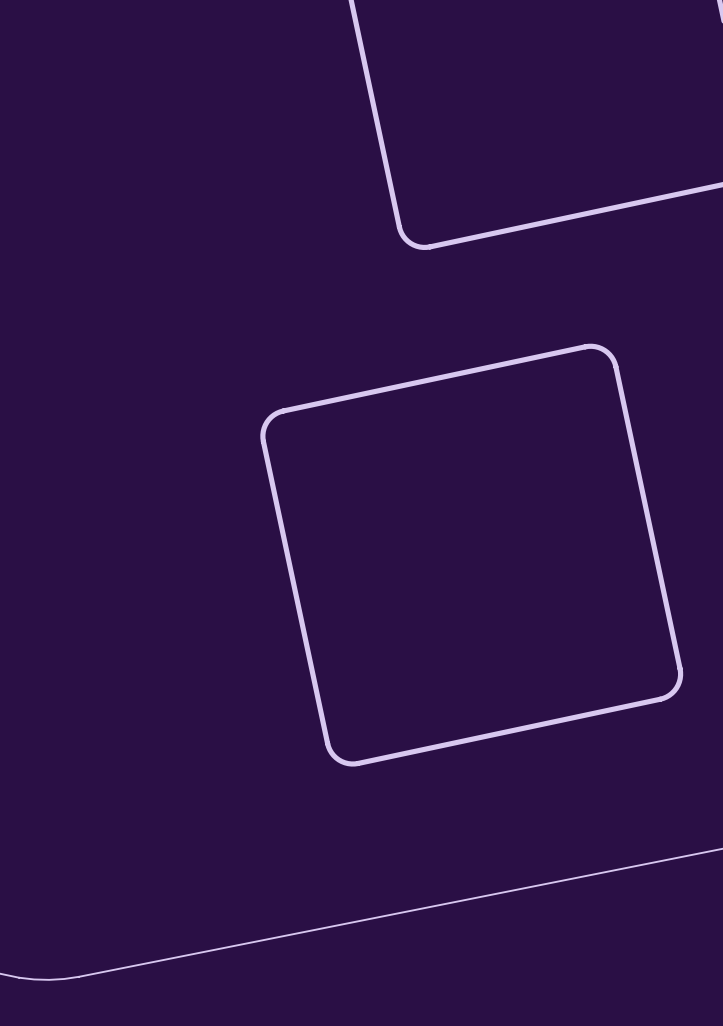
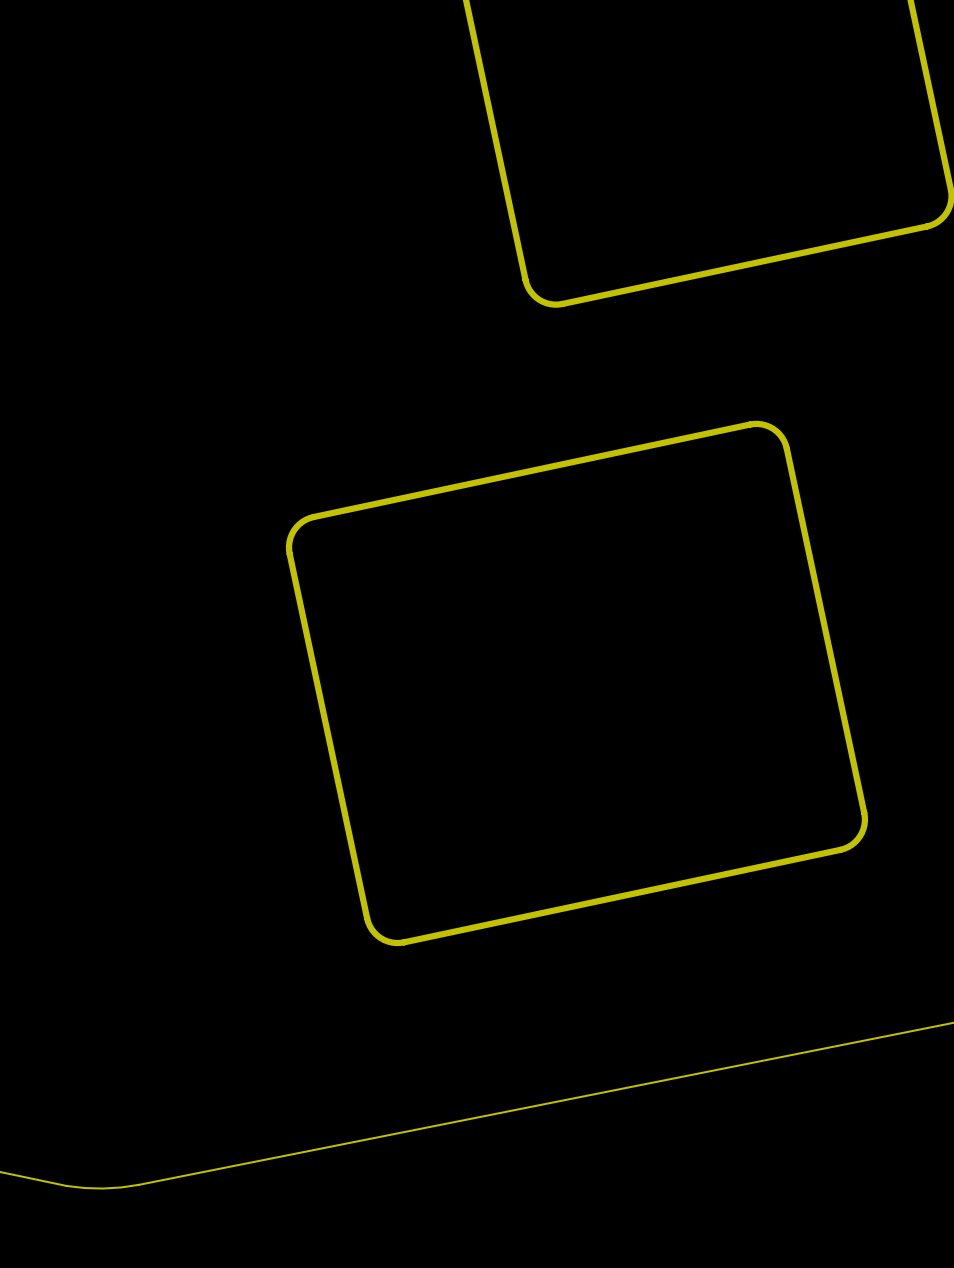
board edge: (585, 346) (283, 411) (274, 414) (267, 422) (263, 431) (263, 441) (327, 743) (336, 757) (344, 762) (354, 763) (660, 699) -> (749, 424) (313, 517) (305, 519) (296, 527) (289, 541) (289, 553) (367, 918) (371, 929) (377, 935) (387, 941) (399, 942) (840, 849)

